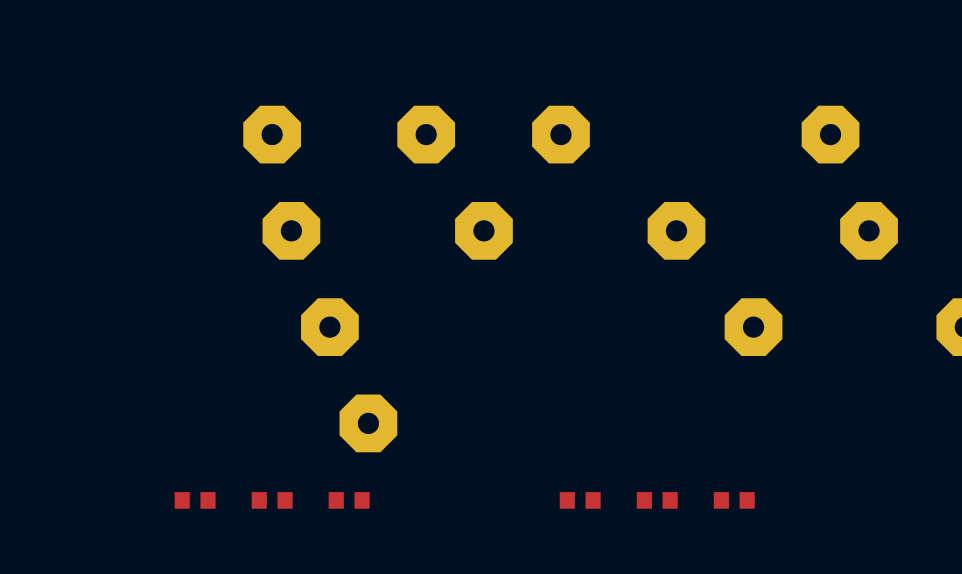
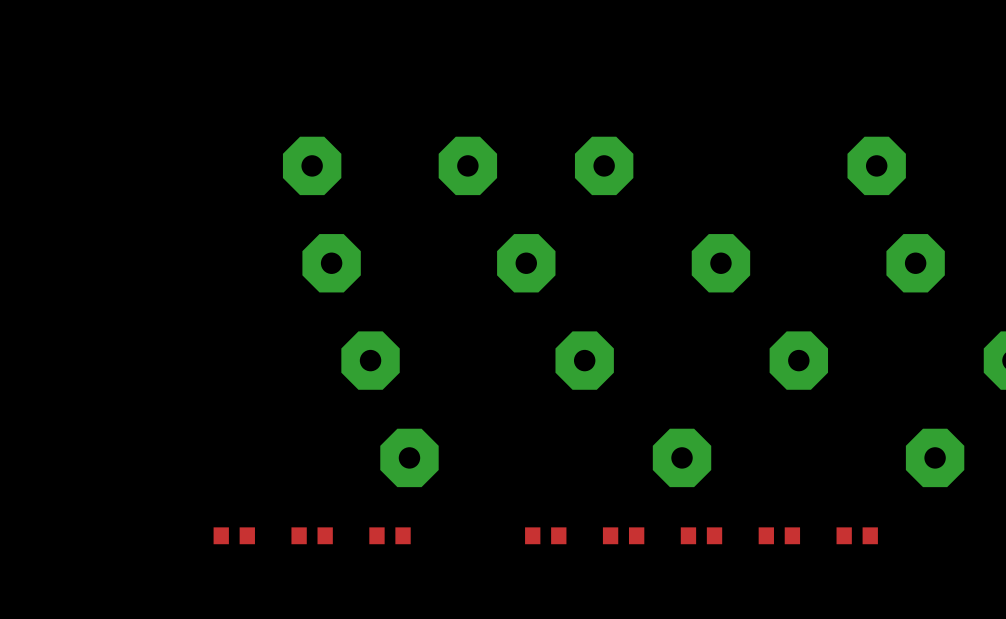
part: none -> (584, 360)
part: none -> (682, 457)
part: none -> (935, 457)
part: none -> (545, 535)
part: none -> (857, 535)

